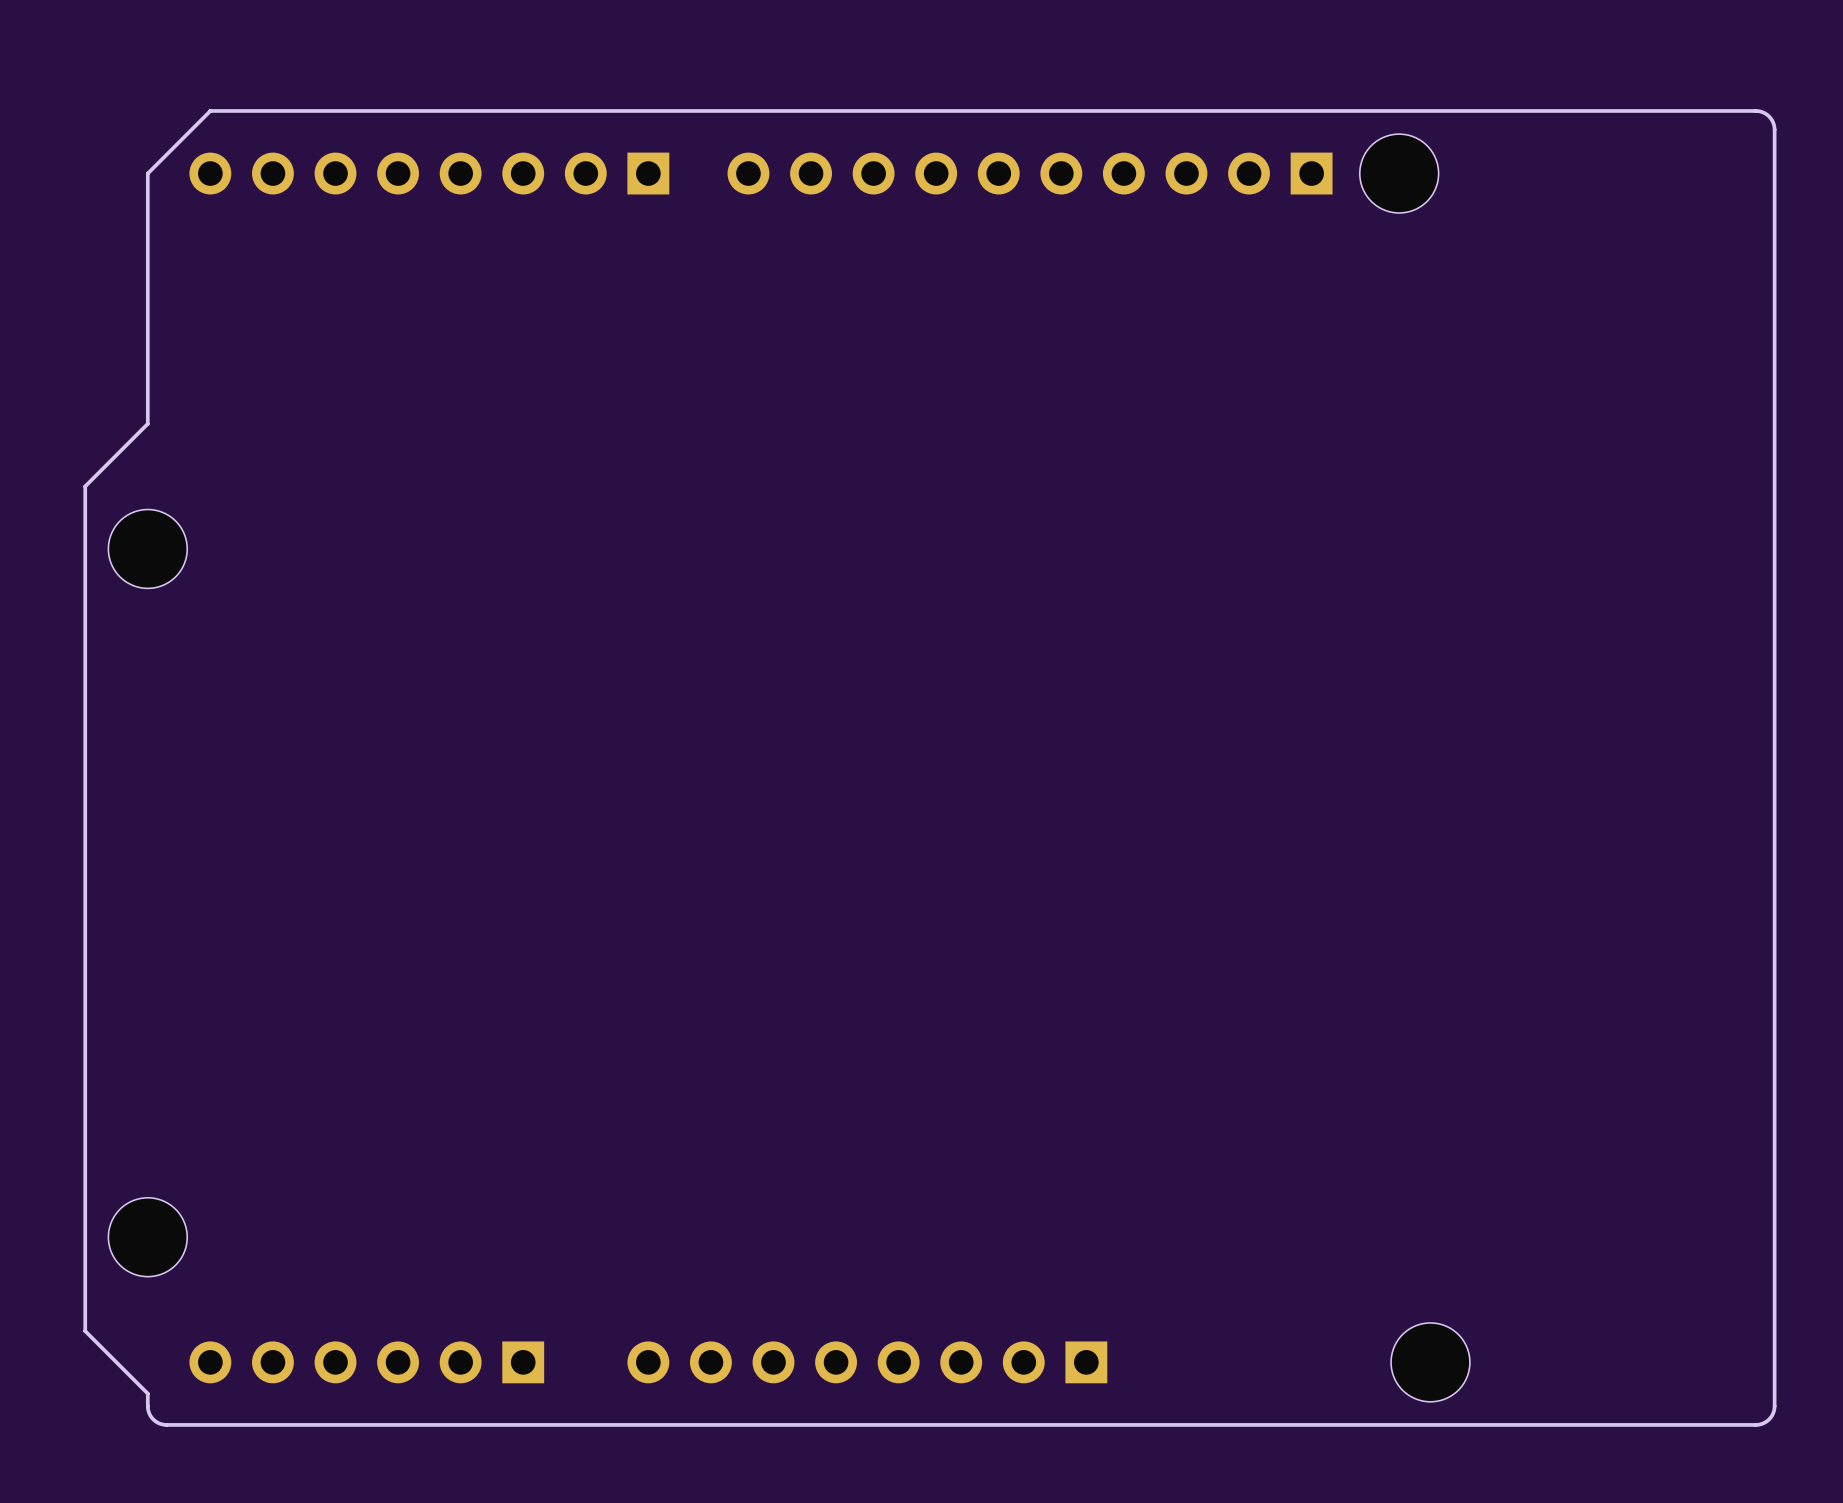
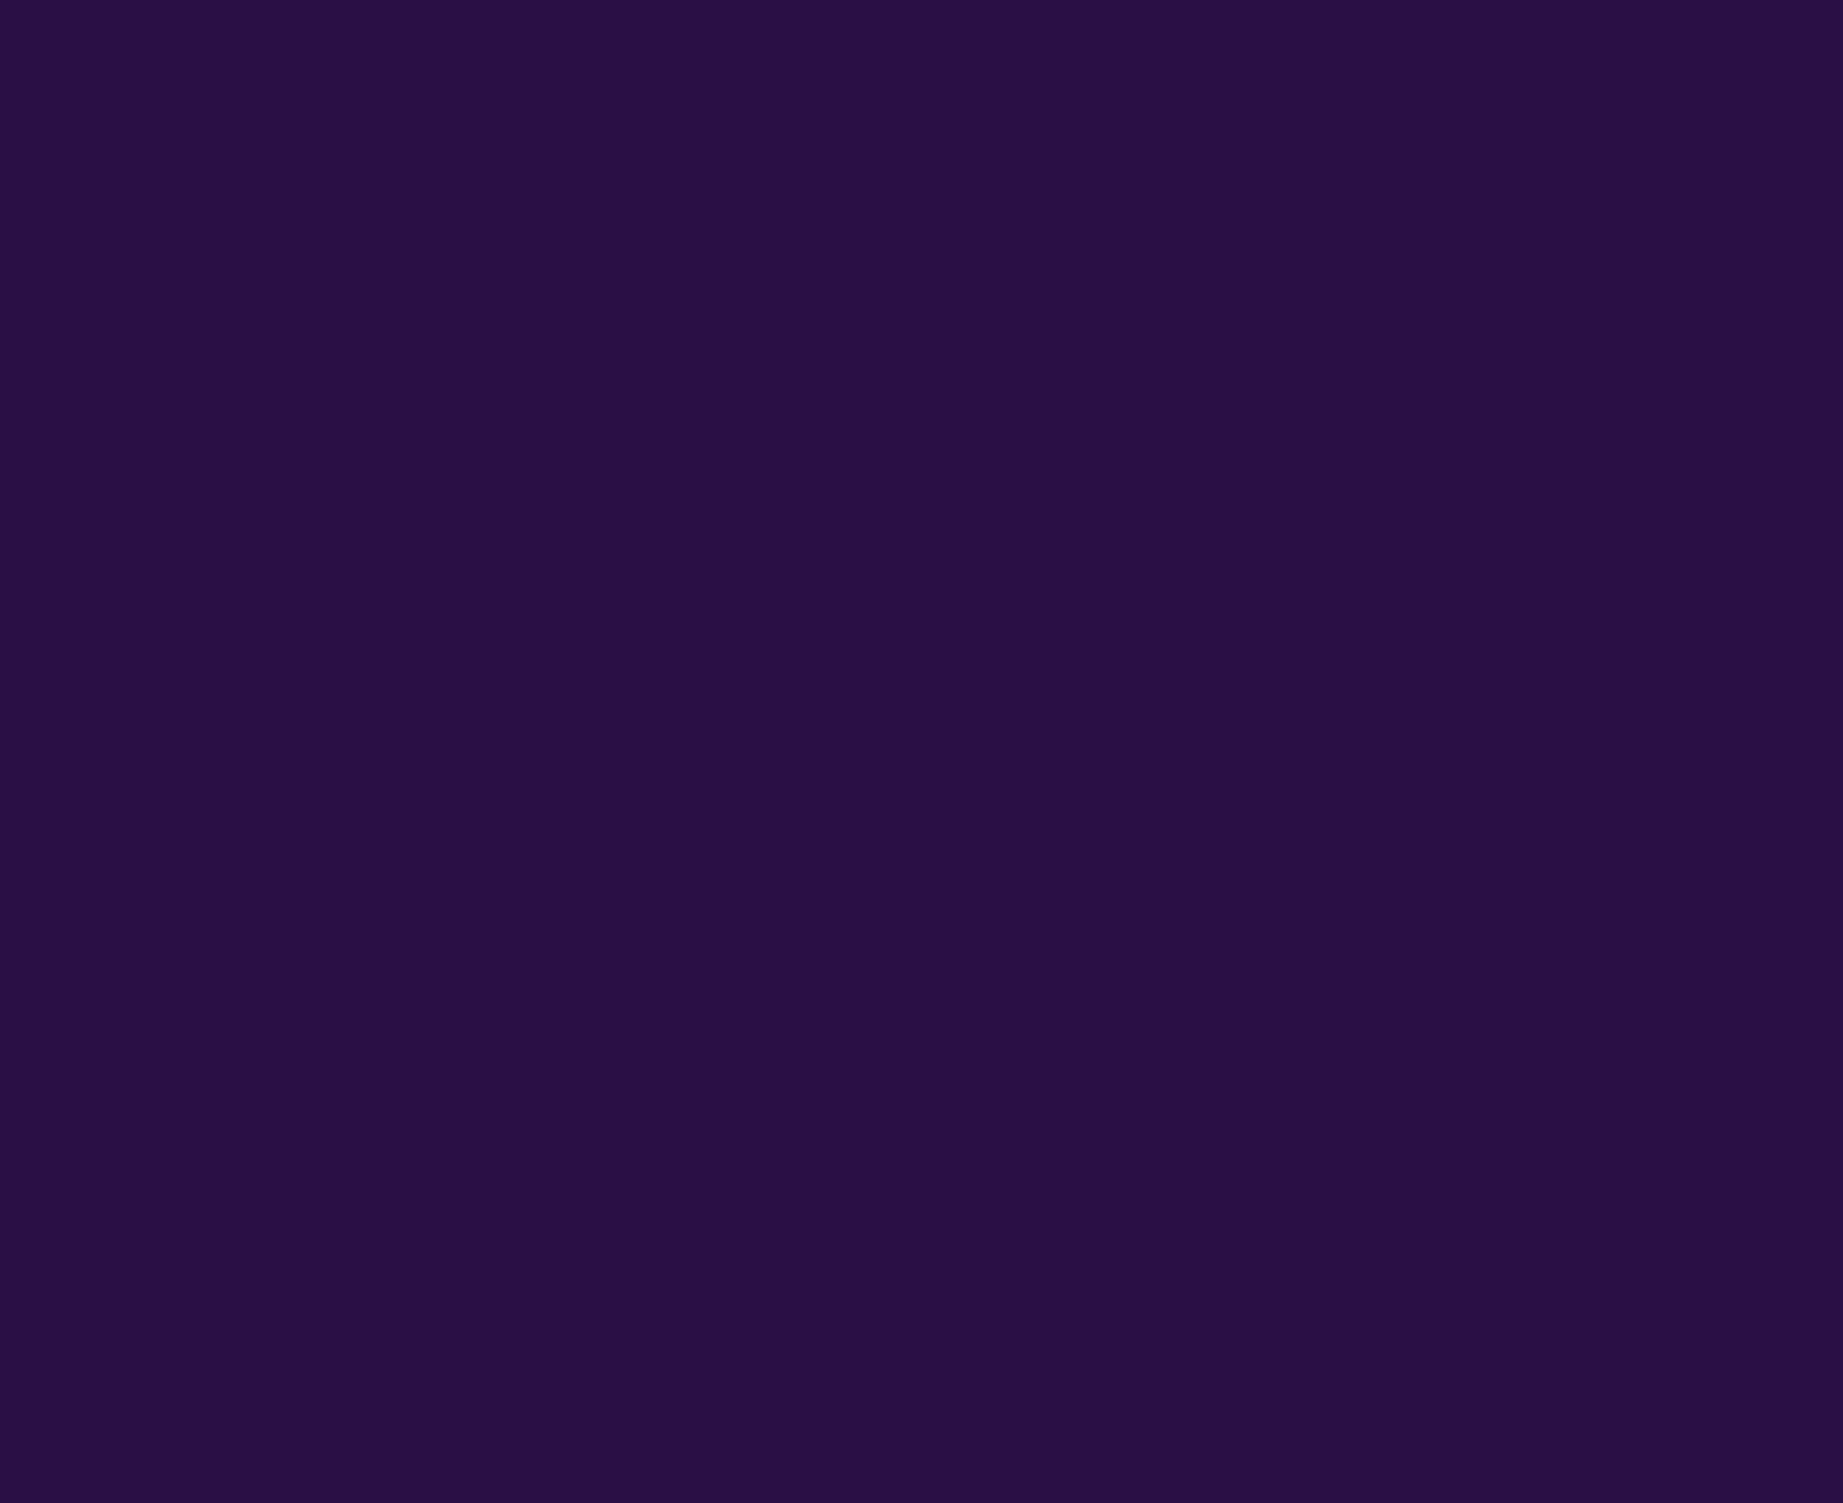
board edge: (1755, 110) (210, 110) (147, 173) (147, 423) (85, 486) (85, 1331) (147, 1393) (147, 1408) (151, 1417) (157, 1422) (166, 1424) (1755, 1424) (1767, 1421) (1772, 1415) (1774, 1406) (1774, 129) (1769, 116) (1755, 110) -> none
part: (429, 173) -> none
part: (1030, 173) -> none
part: (1399, 173) -> none
part: (147, 548) -> none
part: (147, 1237) -> none
part: (366, 1362) -> none
part: (867, 1362) -> none
part: (1430, 1362) -> none

